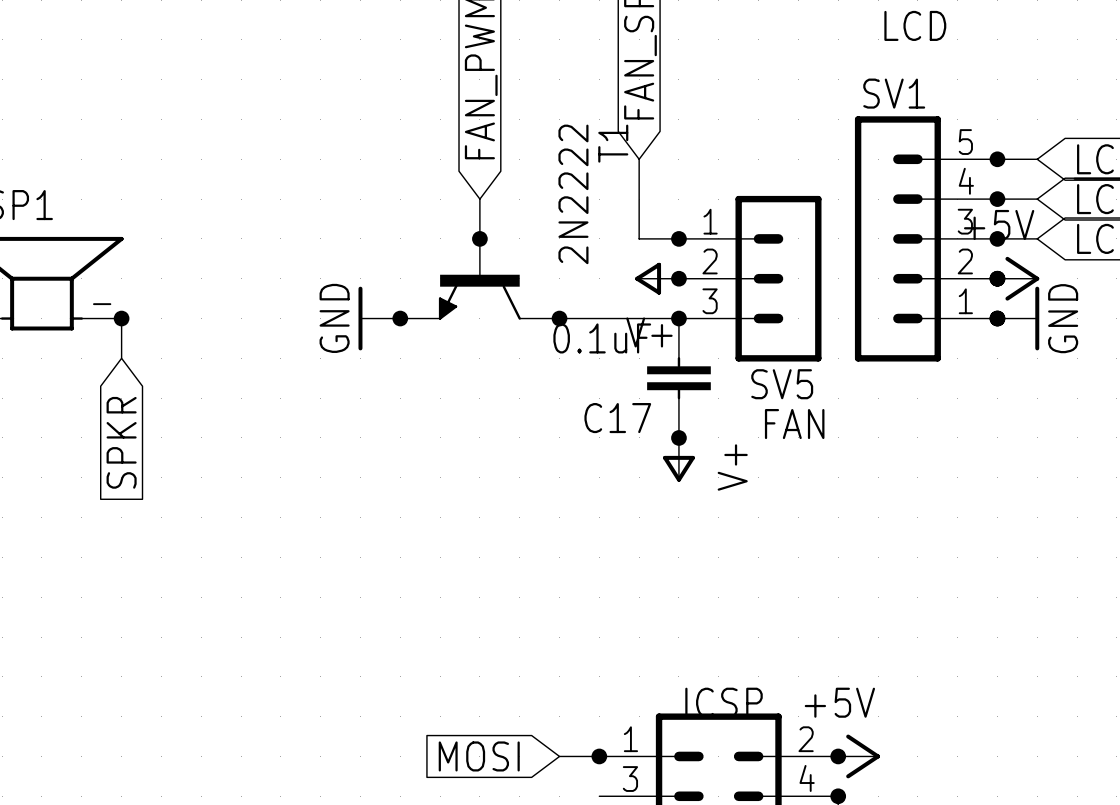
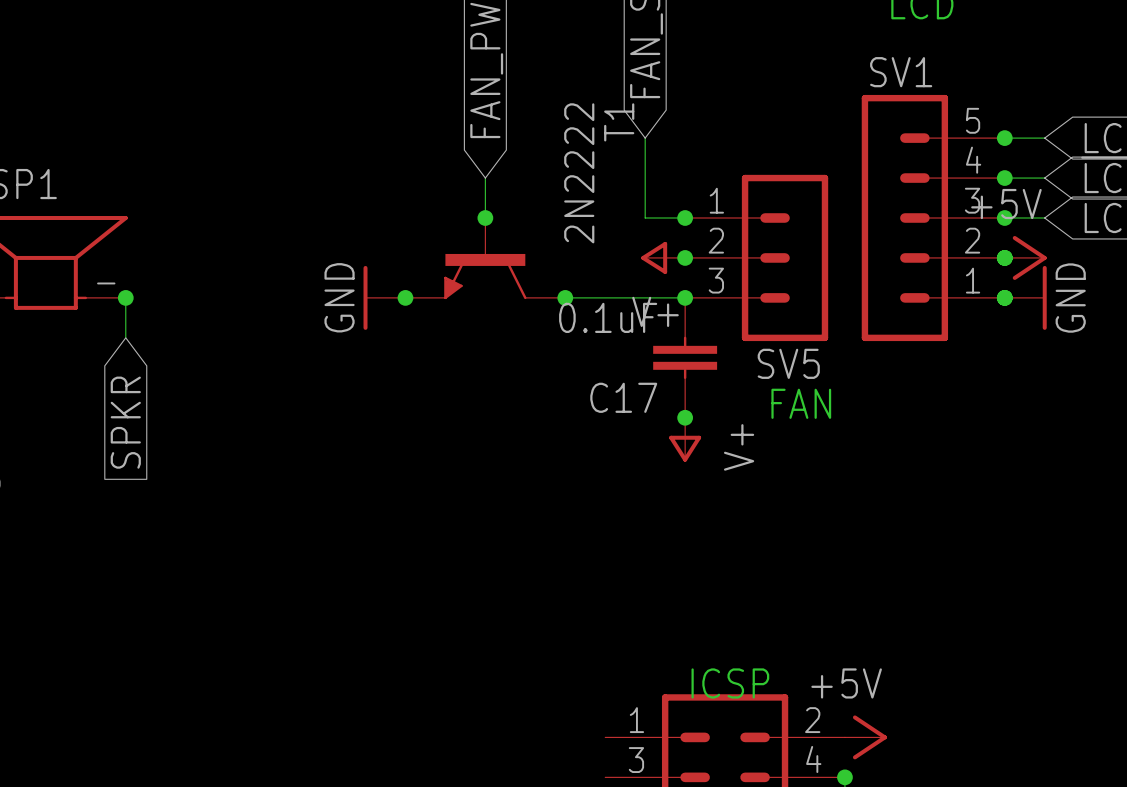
global label: MOSI (479, 756) -> none
wire: (559, 756) (599, 756) -> none
junction: (599, 756) -> none
junction: (838, 756) -> none

